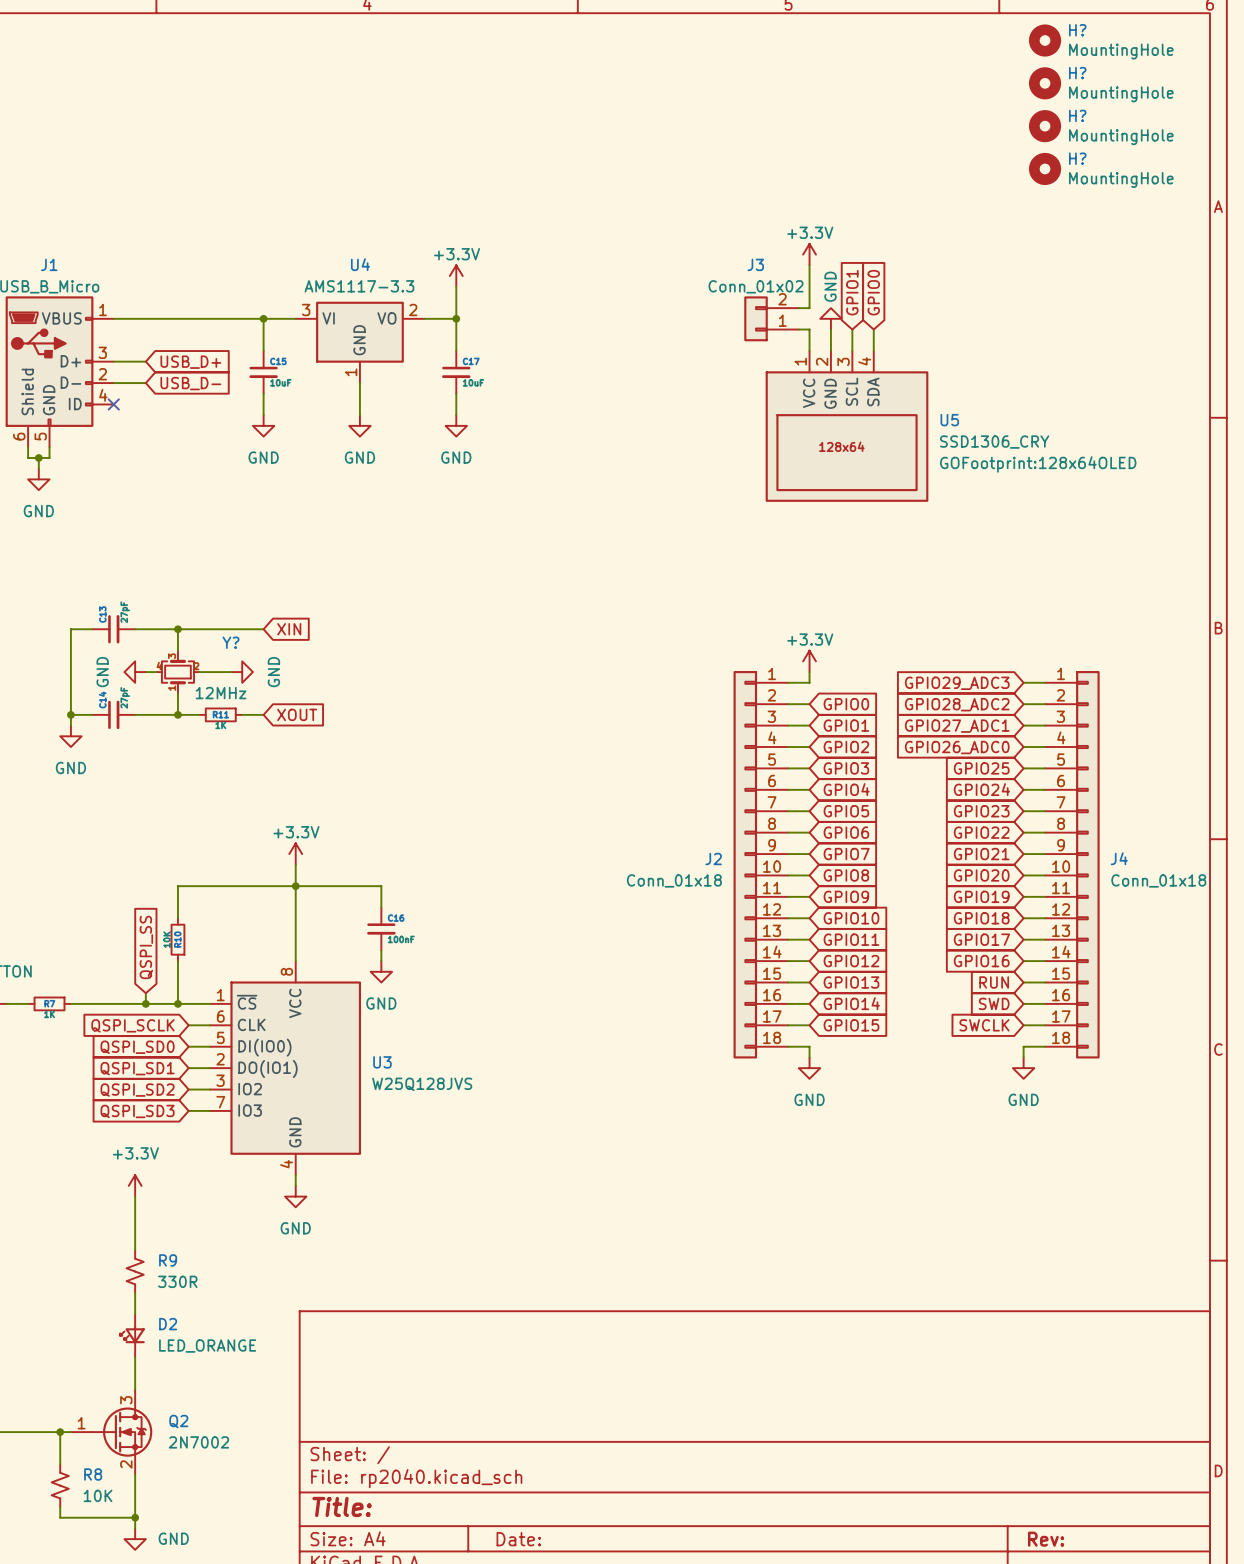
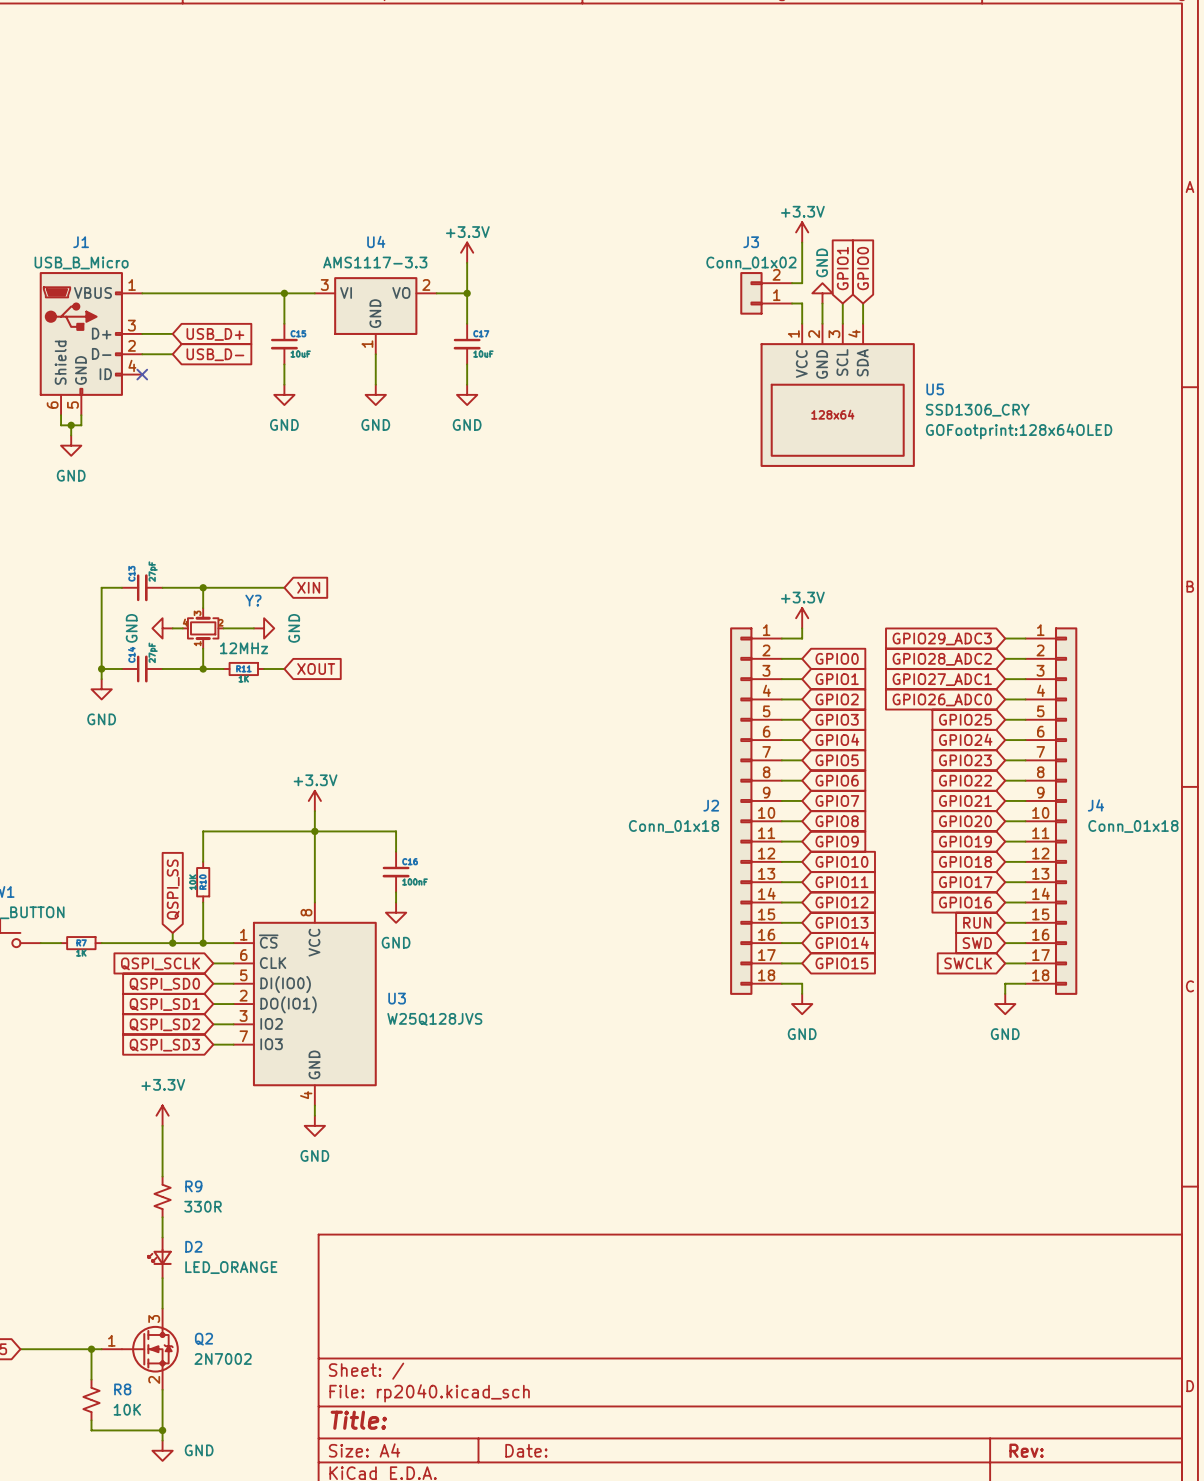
H?: MountingHole (1045, 40) -> none
H?: MountingHole (1045, 83) -> none
H?: MountingHole (1045, 126) -> none
H?: MountingHole (1045, 168) -> none

